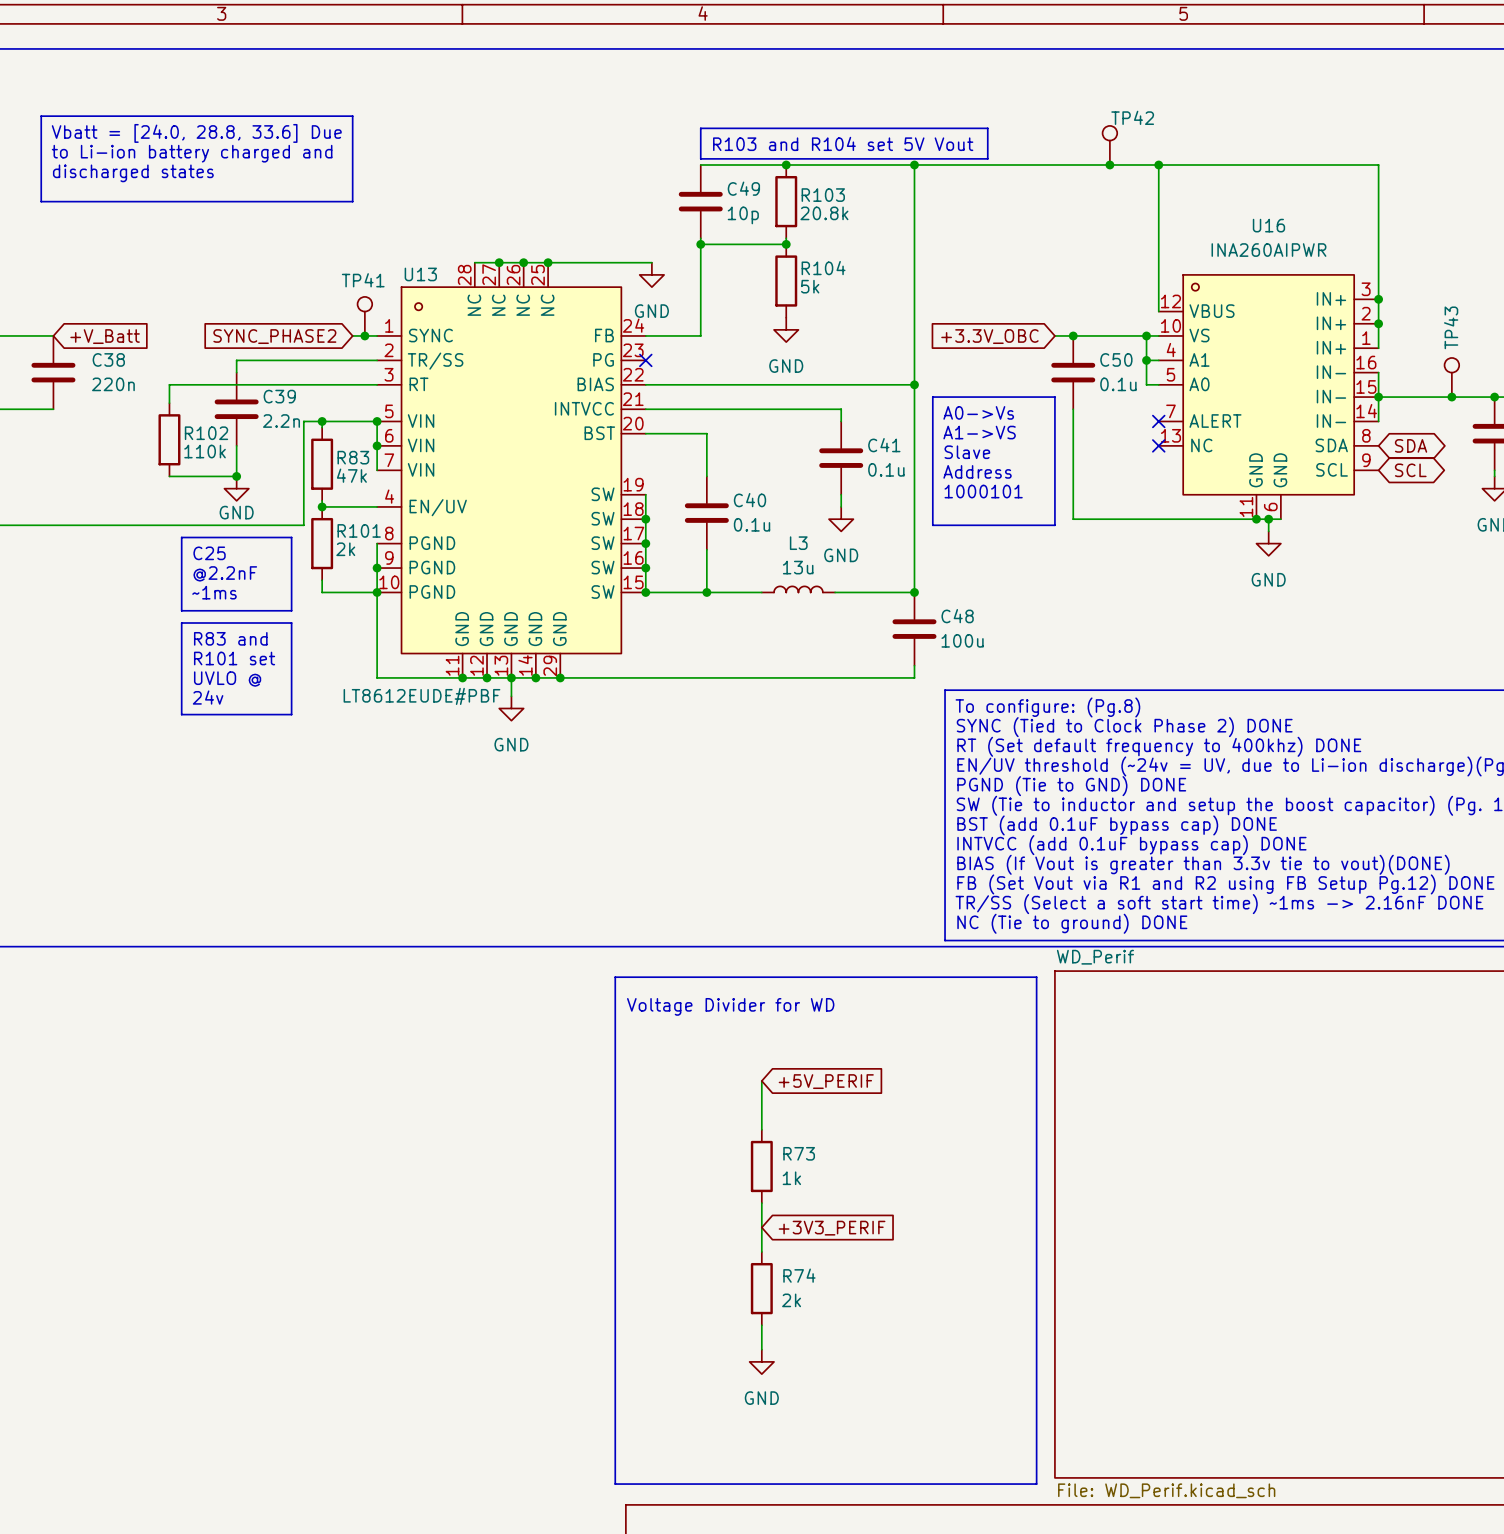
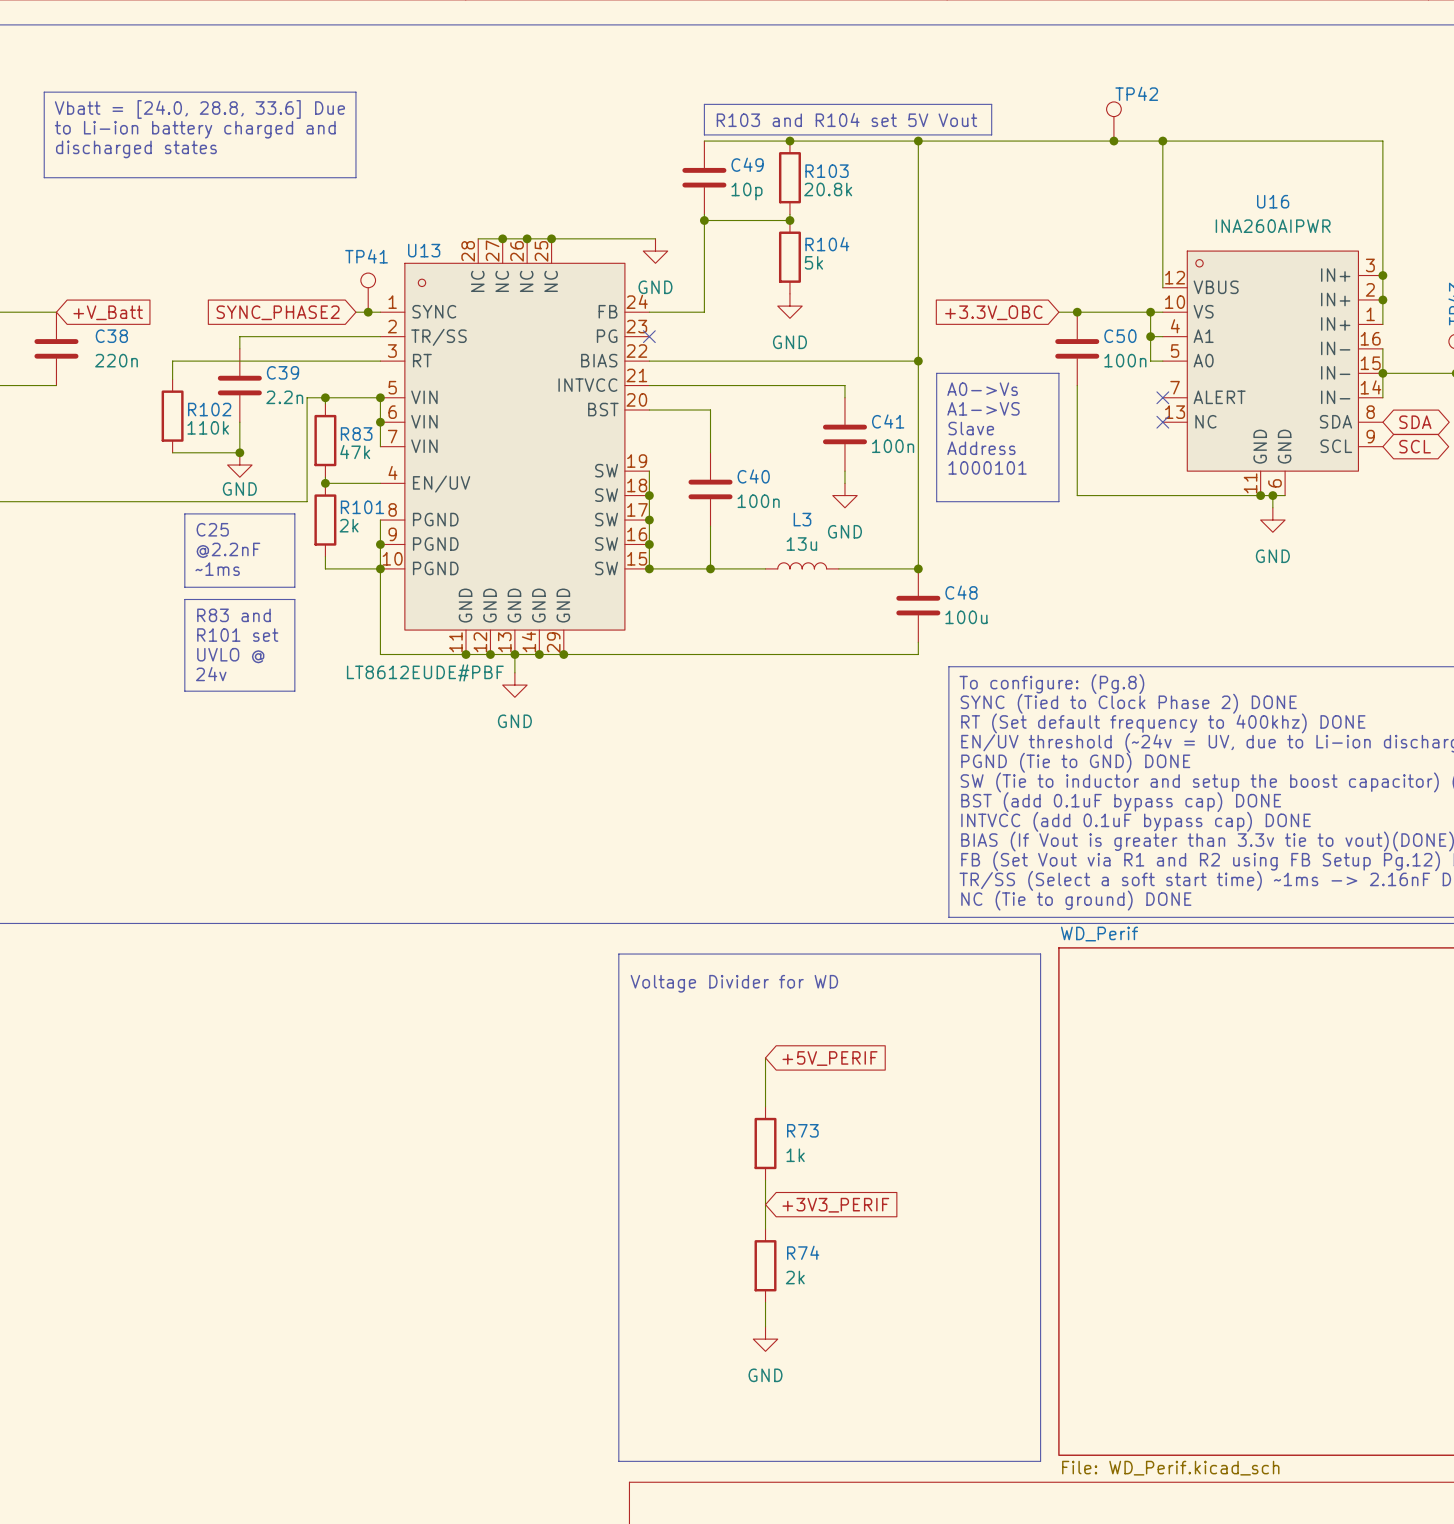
C50 value: 0.1u (1118, 384) -> 100n (1125, 360)
C41 value: 0.1u (886, 469) -> 100n (893, 446)
C40 value: 0.1u (752, 524) -> 100n (758, 501)

